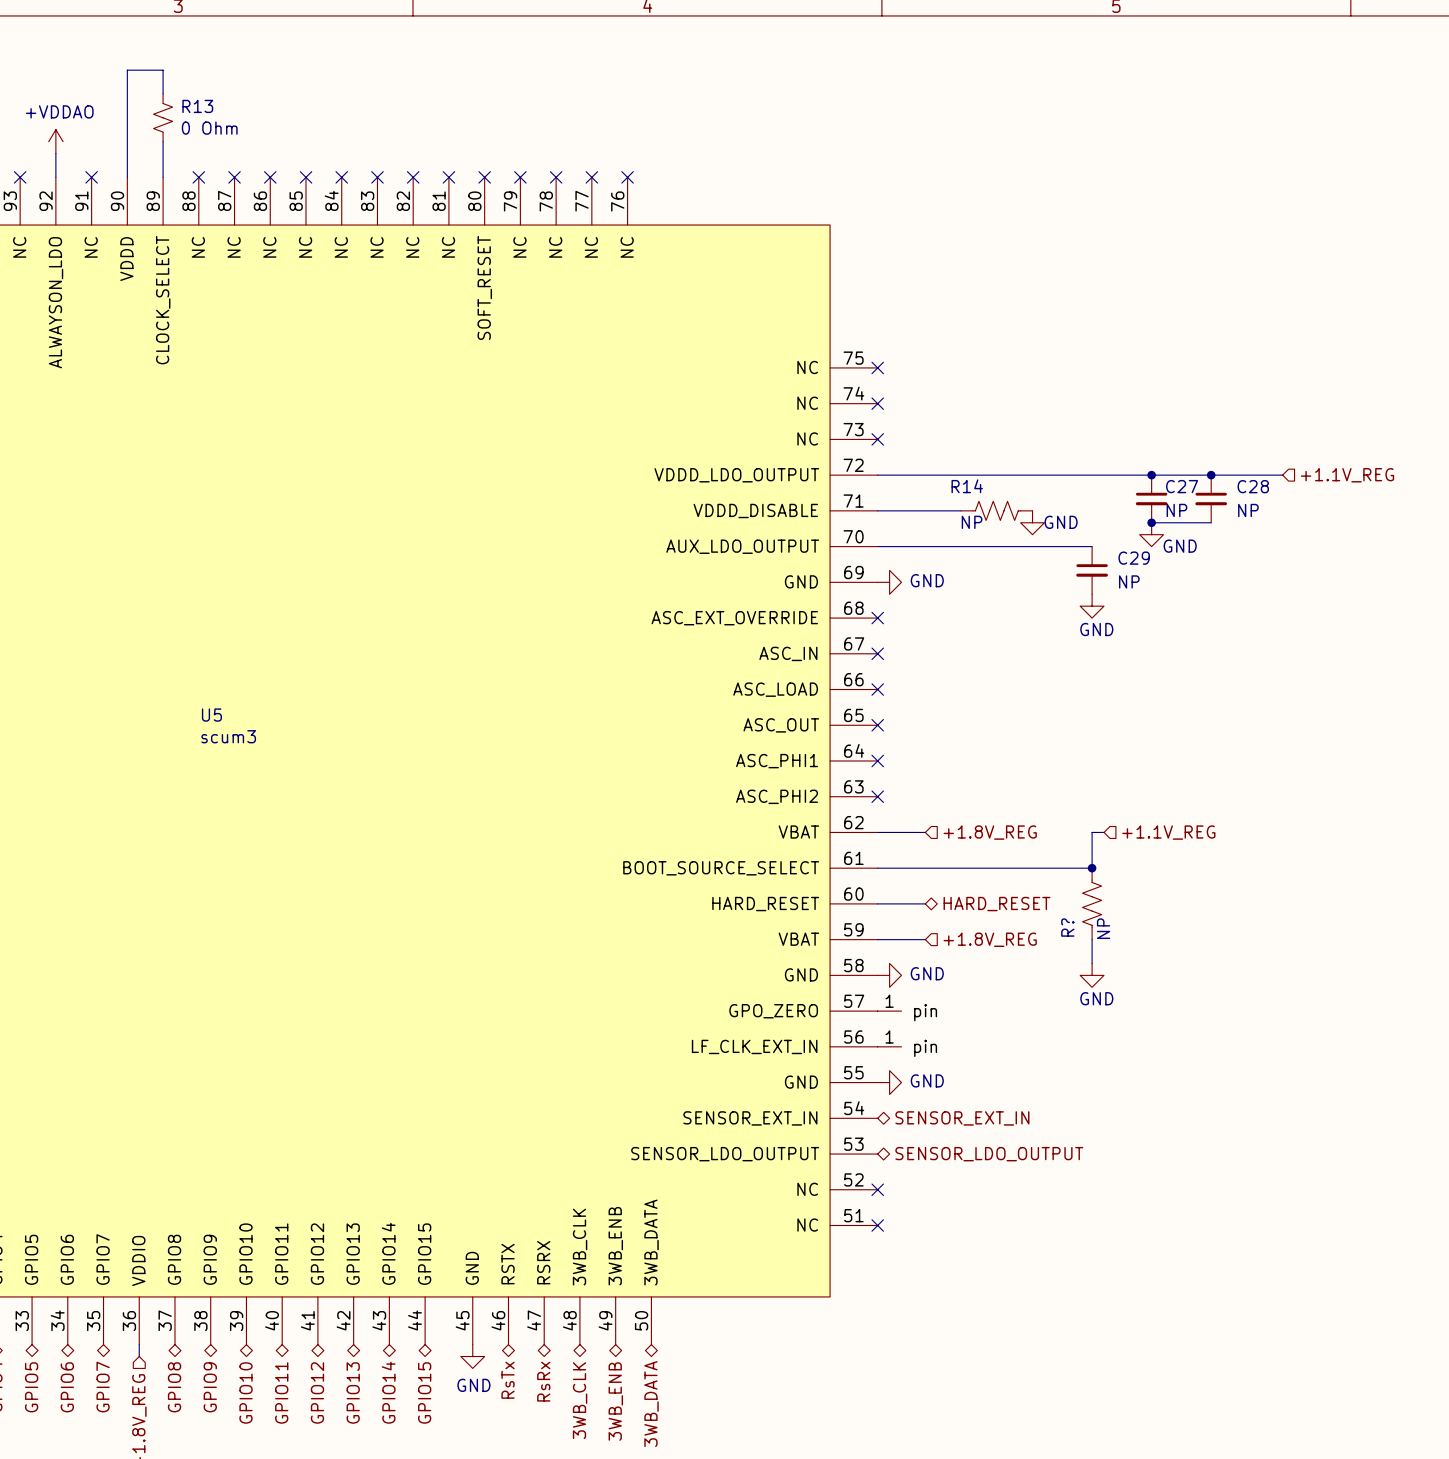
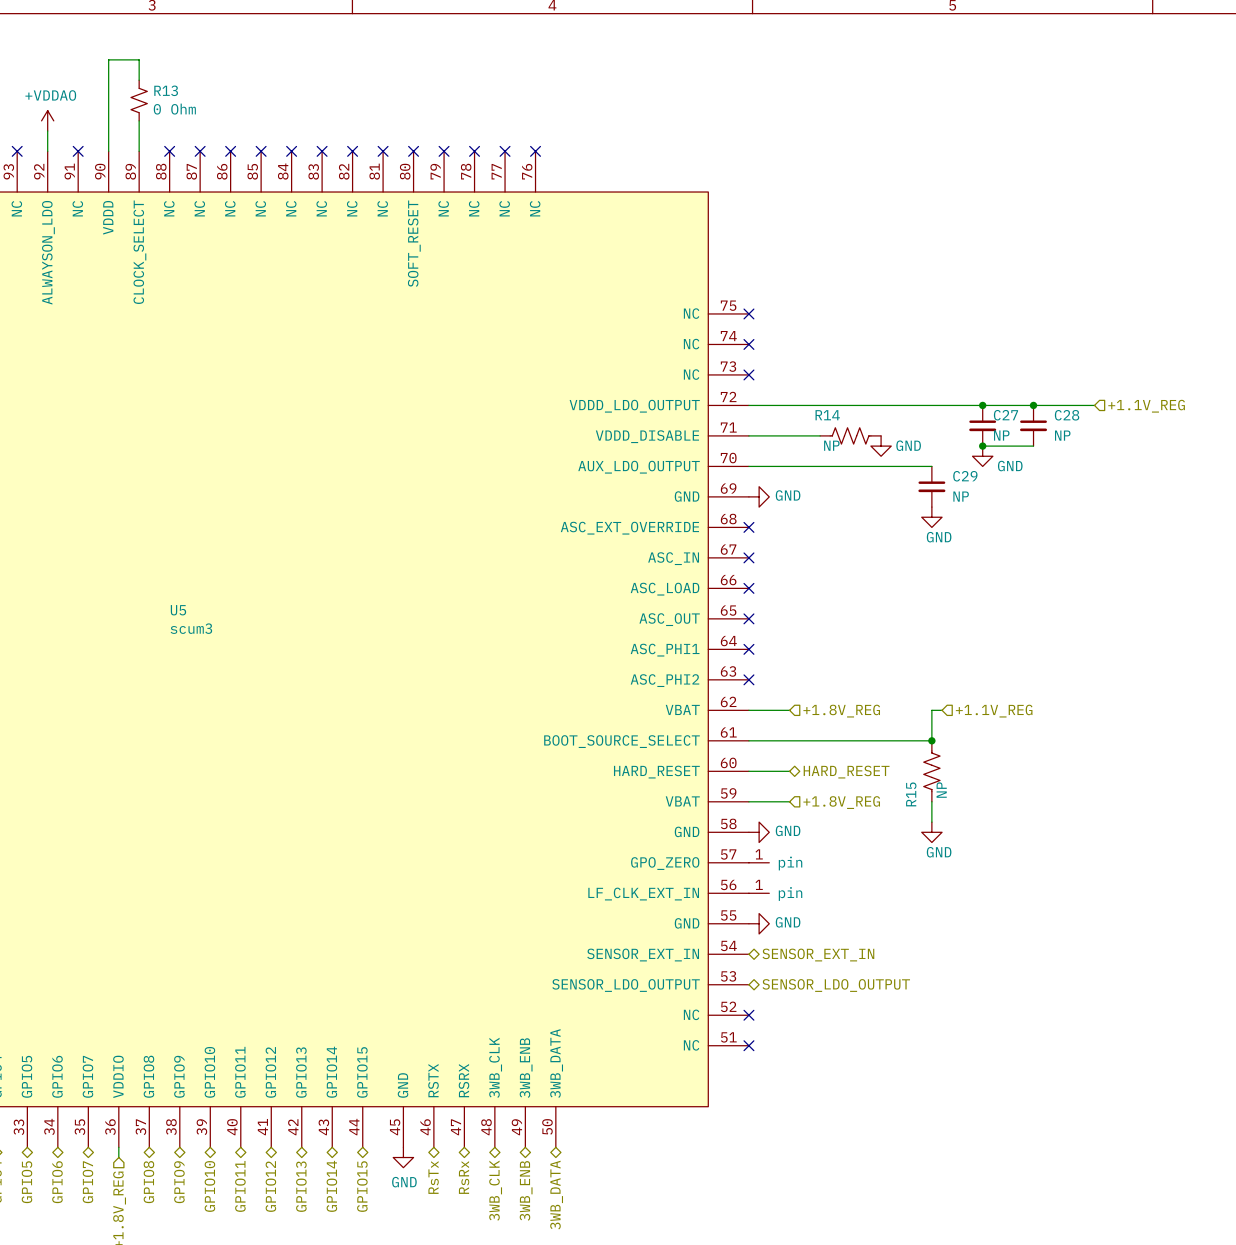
R? name: R? (1067, 927) -> R15 (911, 794)

